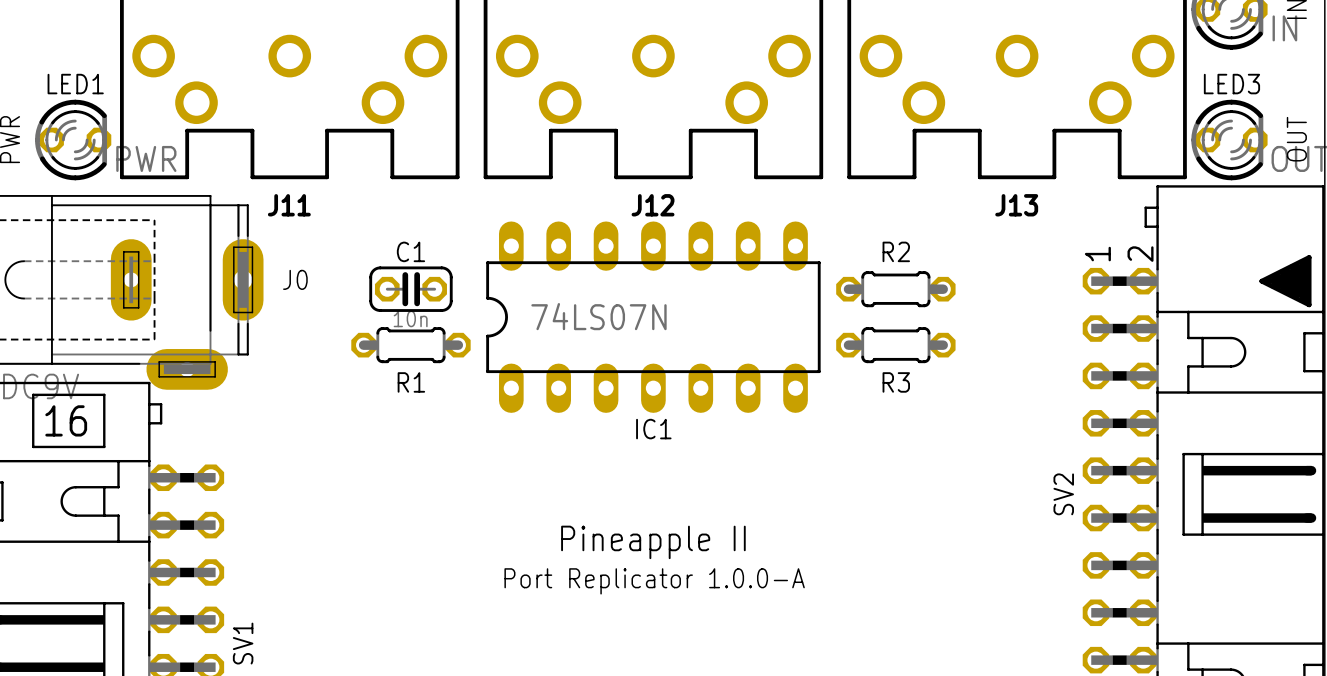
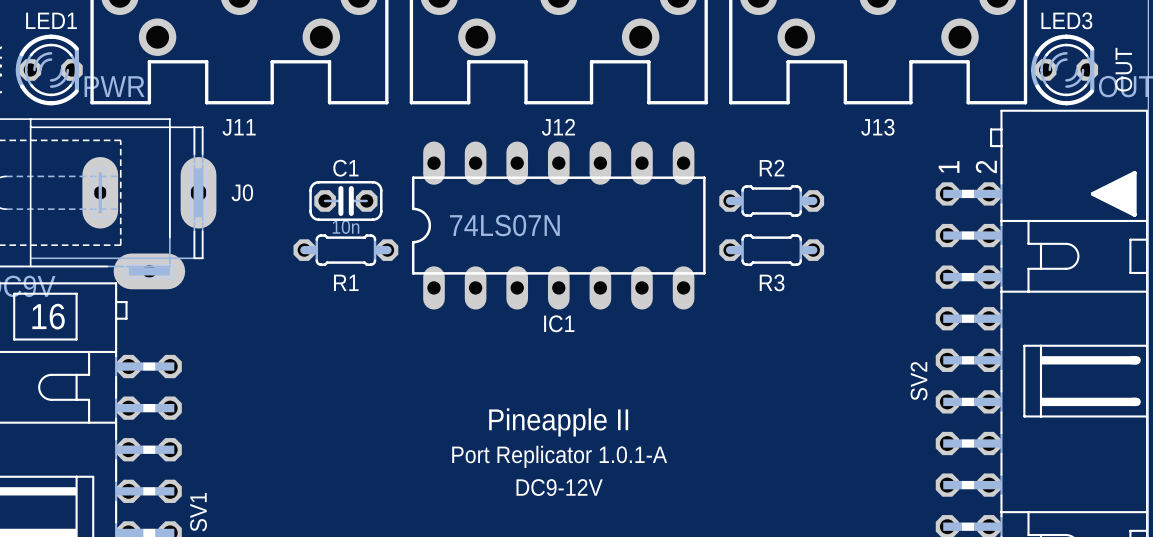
text: Port Replicator 1.0.0-A (654, 581) -> Port Replicator 1.0.1-A (559, 456)
text: none -> DC9-12V (559, 487)

